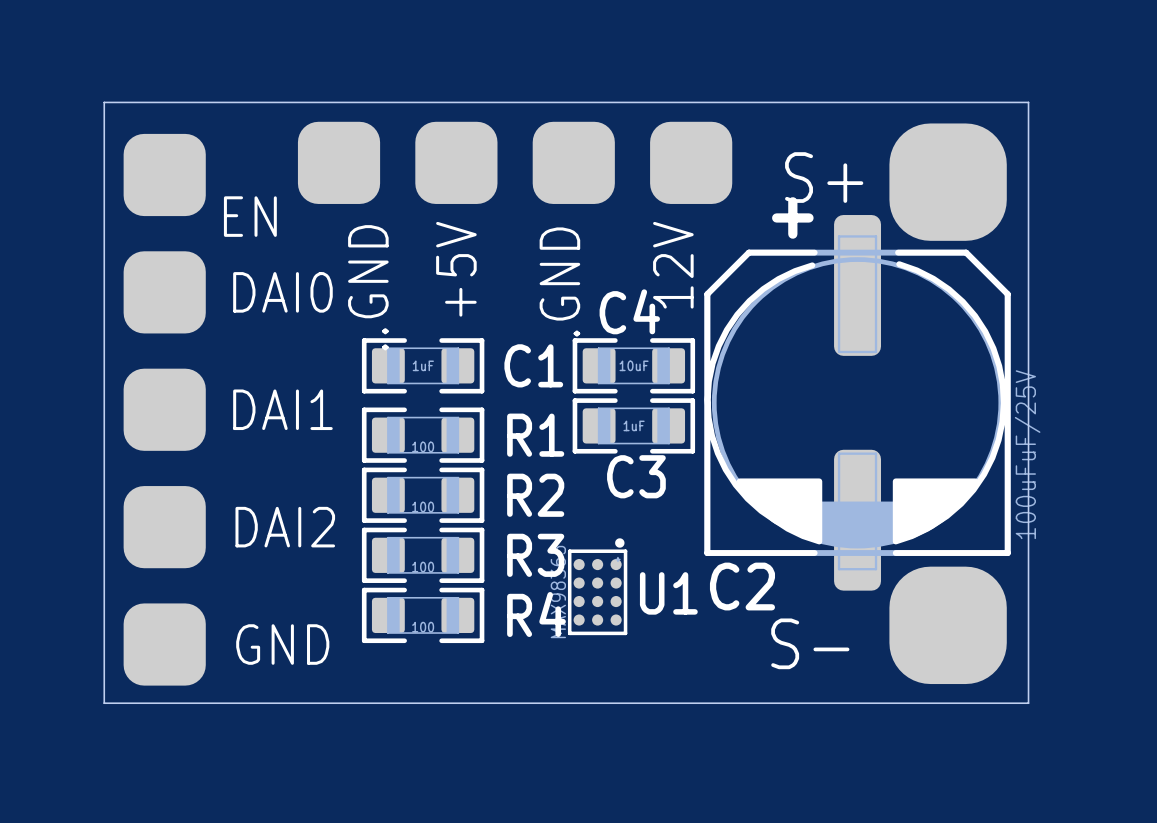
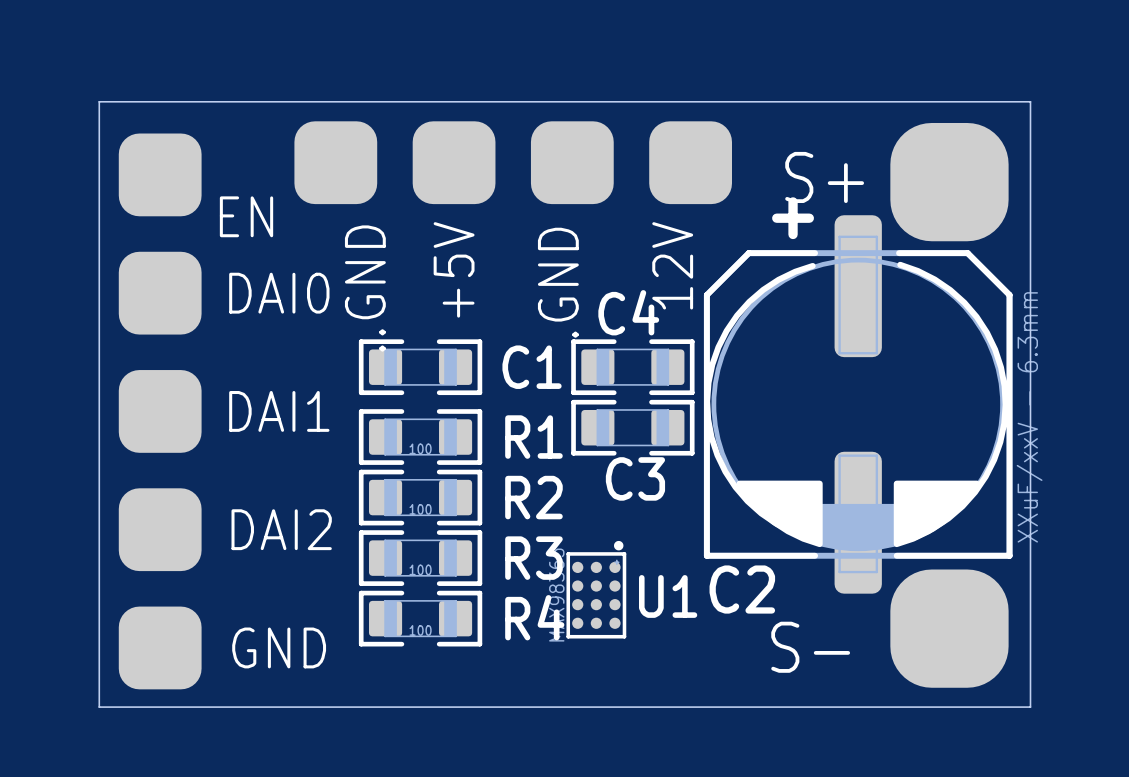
C1 value: 1uF (423, 365) -> none
C4 value: 10uF (634, 365) -> none
C3 value: 1uF (634, 425) -> none
C2 value: 100uFuF/25V (1027, 454) -> XXuF/xxV - 6.3mm (1029, 417)

